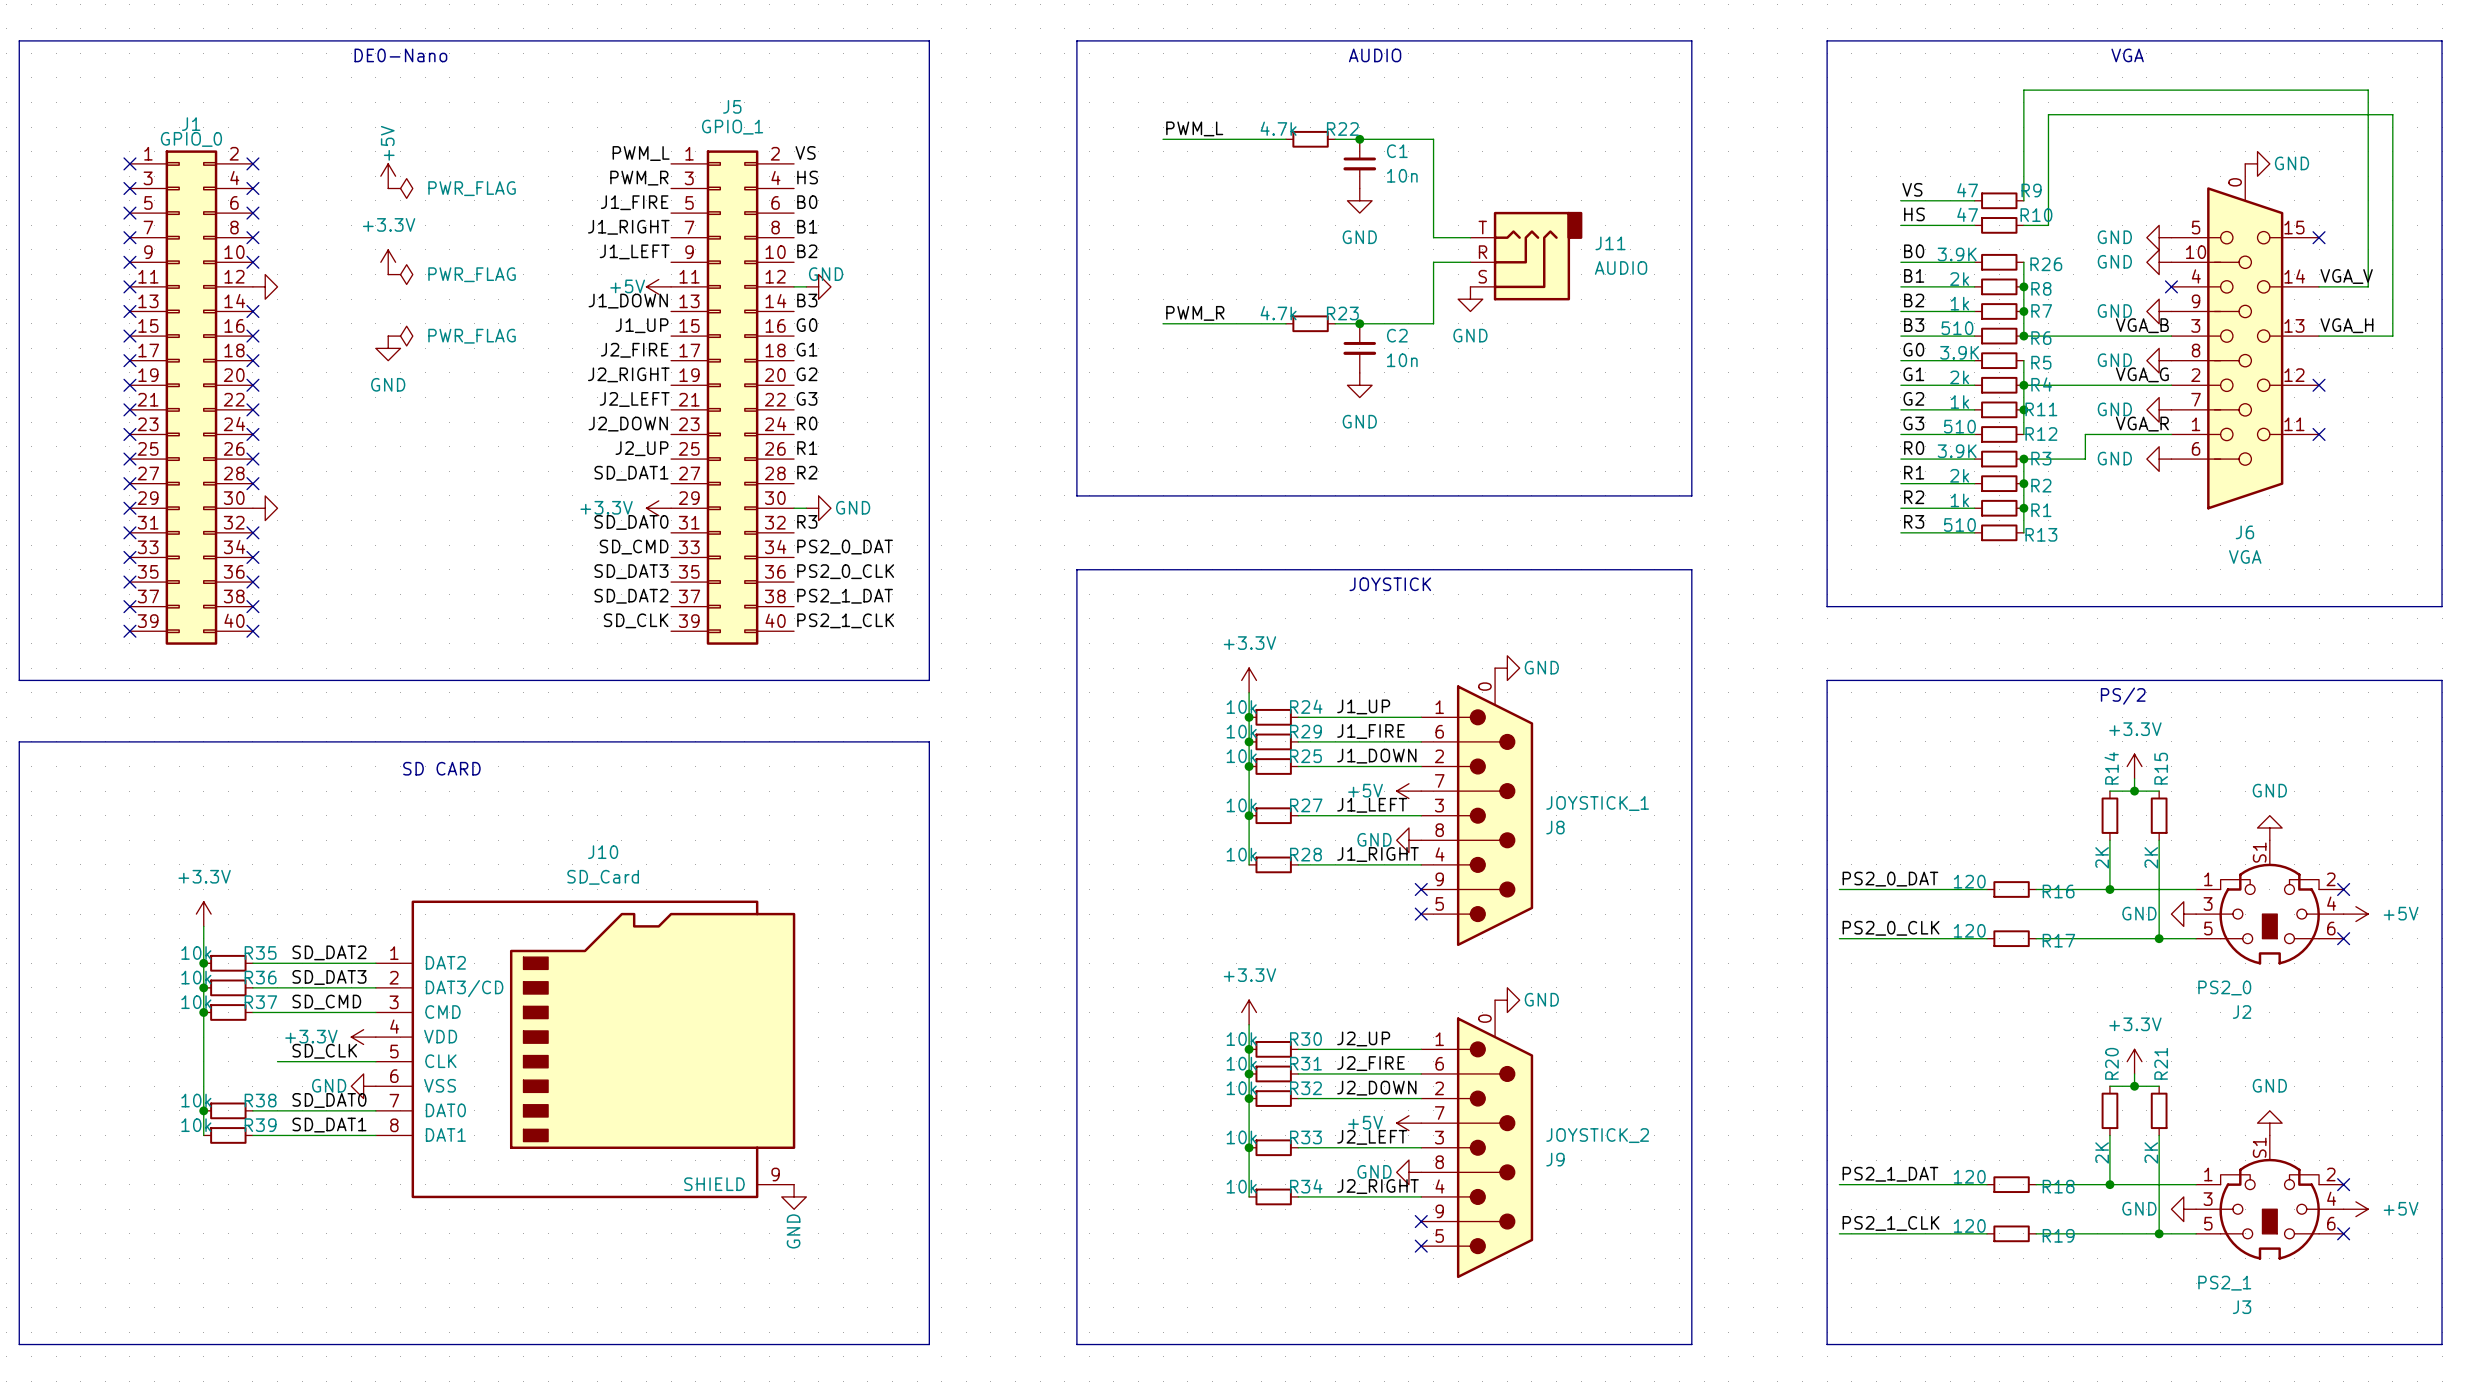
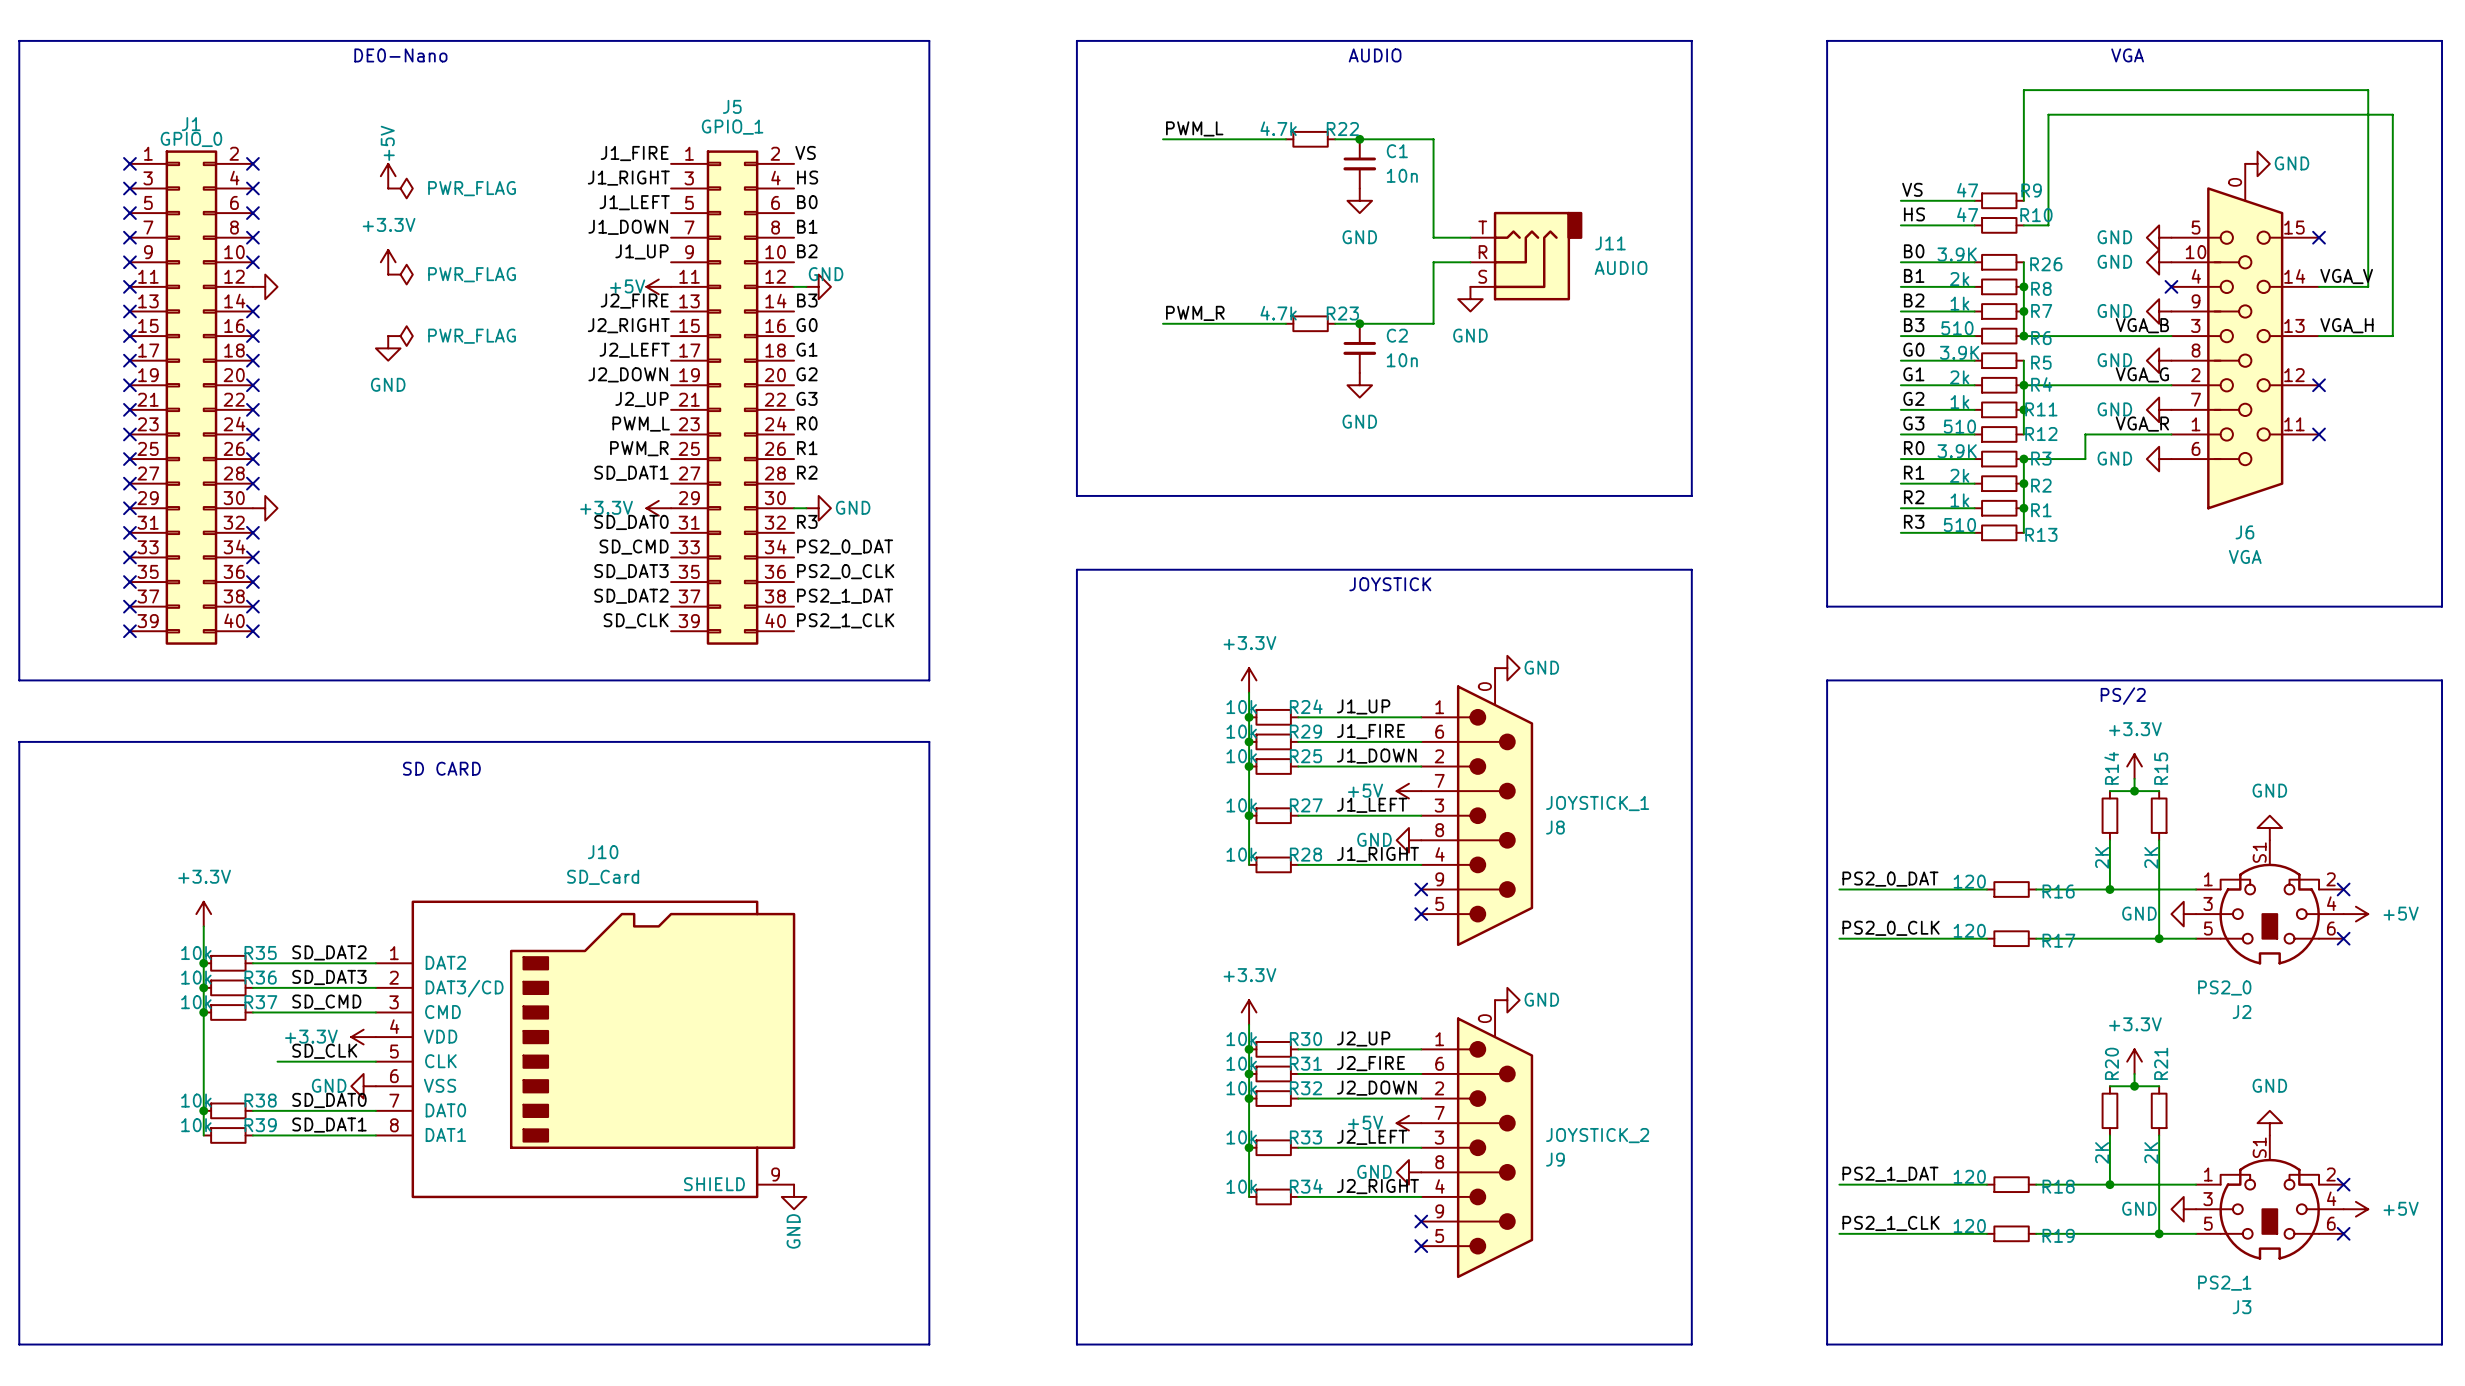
label: PWM_L (641, 153) -> J1_FIRE (634, 153)
label: PWM_R (639, 178) -> J1_RIGHT (628, 178)
label: J1_FIRE (634, 202) -> J1_LEFT (634, 202)
label: J1_RIGHT (628, 227) -> J1_DOWN (628, 227)
label: J1_LEFT (634, 251) -> J1_UP (641, 251)
label: J1_DOWN (628, 301) -> J2_FIRE (634, 301)
label: J1_UP (641, 325) -> J2_RIGHT (628, 325)
label: J2_FIRE (634, 350) -> J2_LEFT (634, 350)
label: J2_RIGHT (628, 374) -> J2_DOWN (628, 374)
label: J2_LEFT (634, 399) -> J2_UP (641, 399)
label: J2_DOWN (628, 424) -> PWM_L (641, 424)
label: J2_UP (641, 448) -> PWM_R (639, 448)

